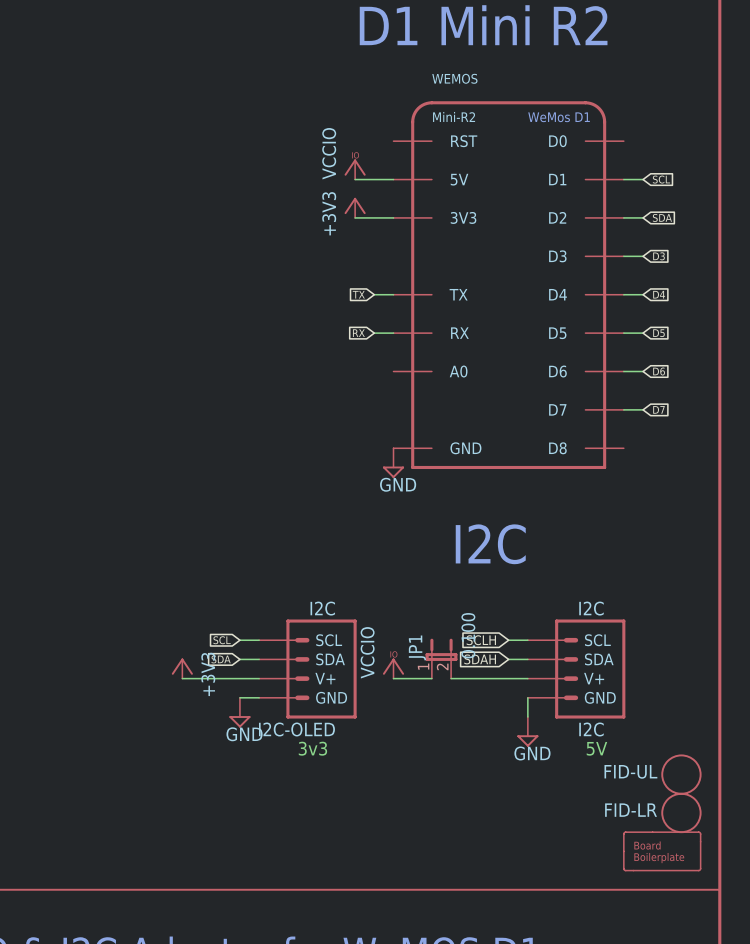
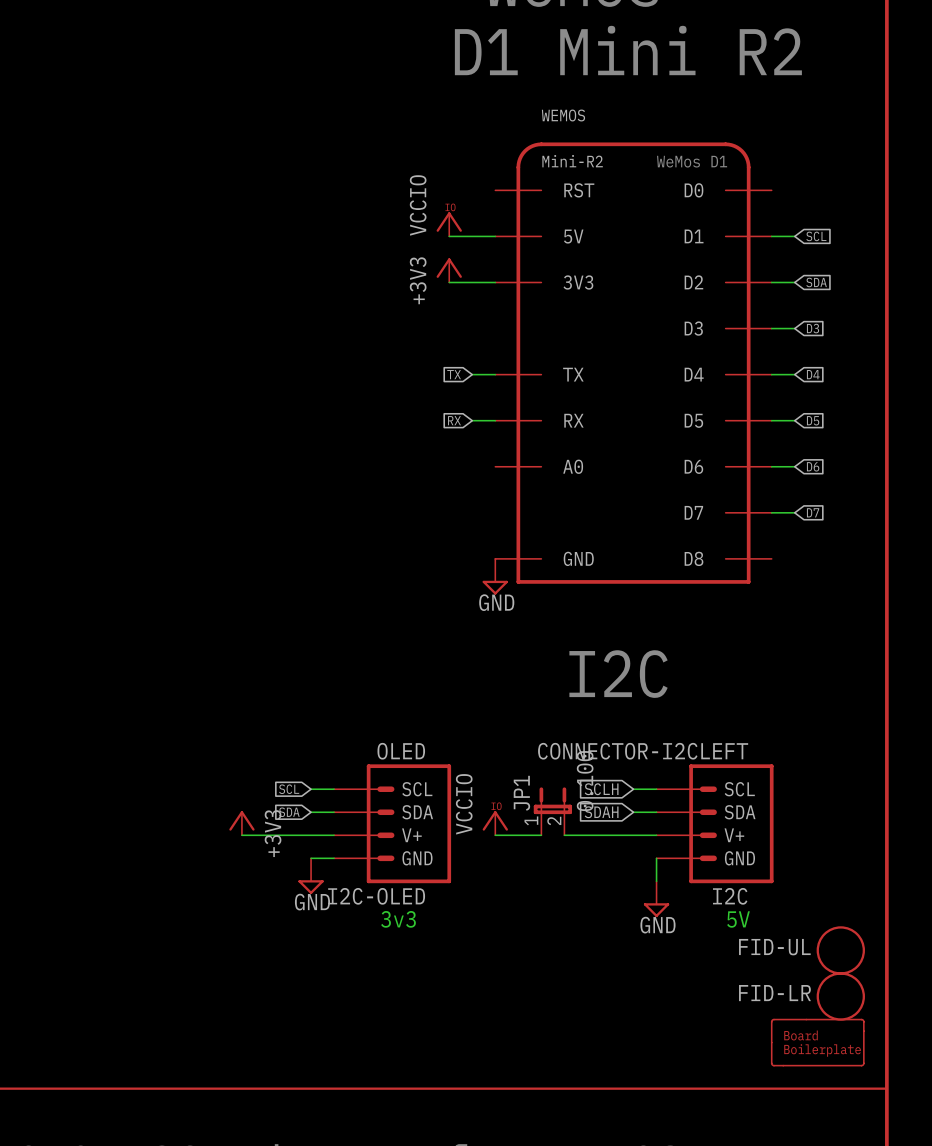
I2C-OLED value: I2C (322, 608) -> OLED (401, 751)
I2C value: I2C (591, 608) -> CONNECTOR-I2CLEFT (643, 751)

